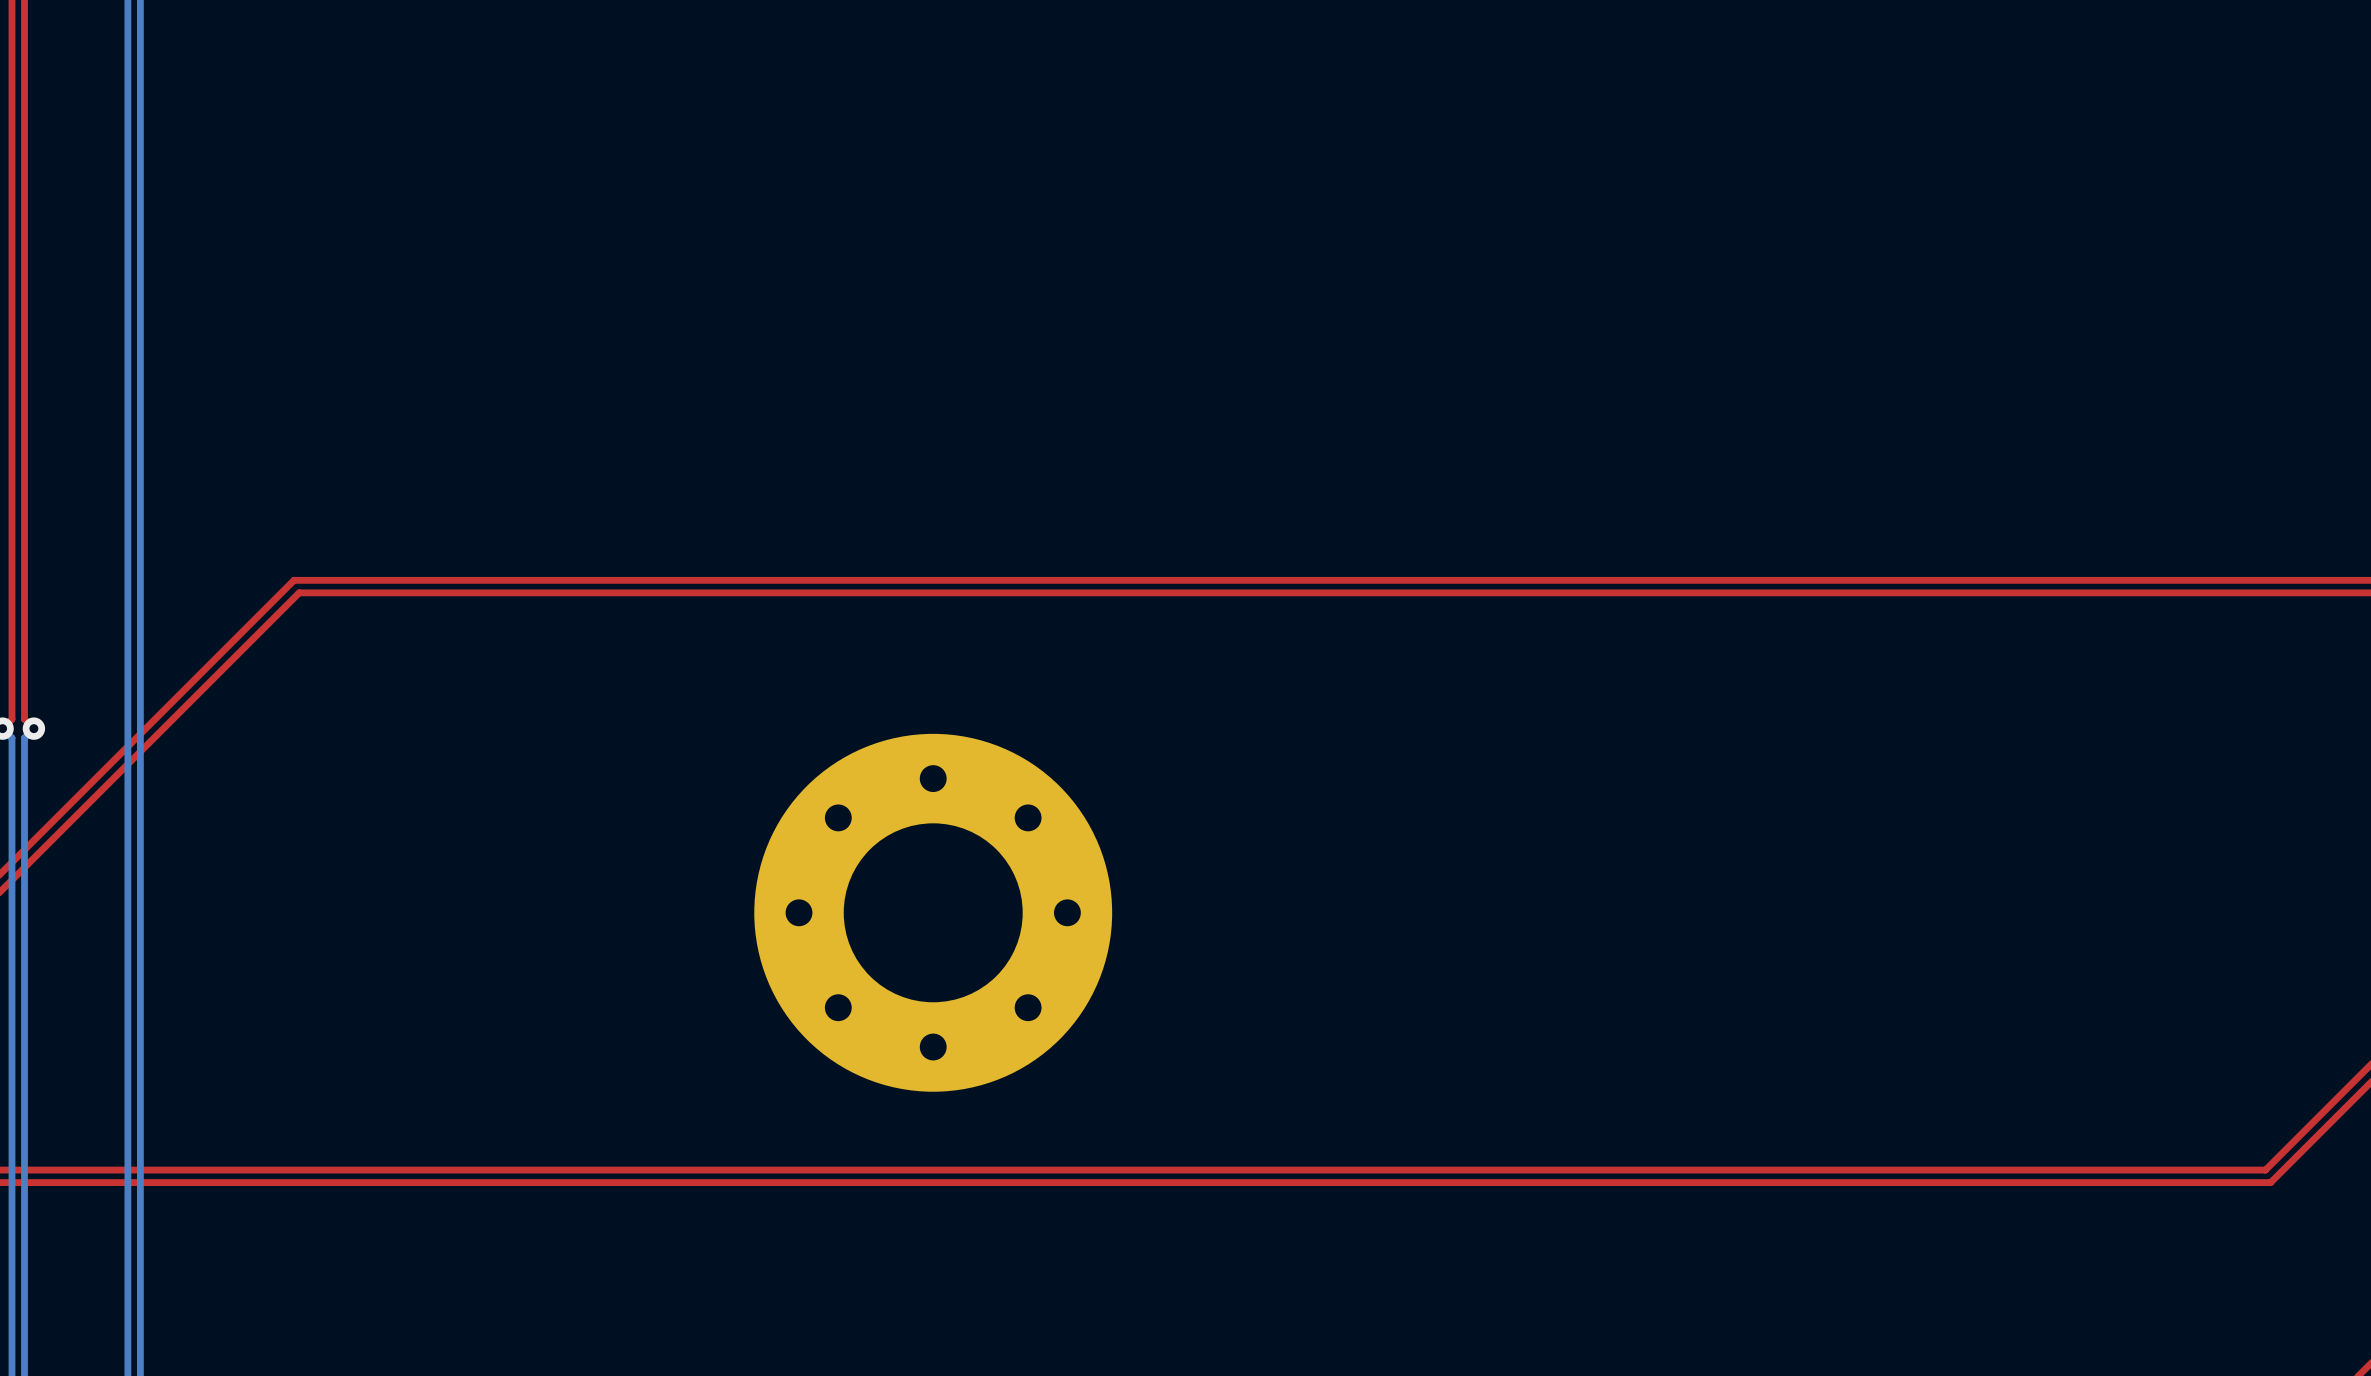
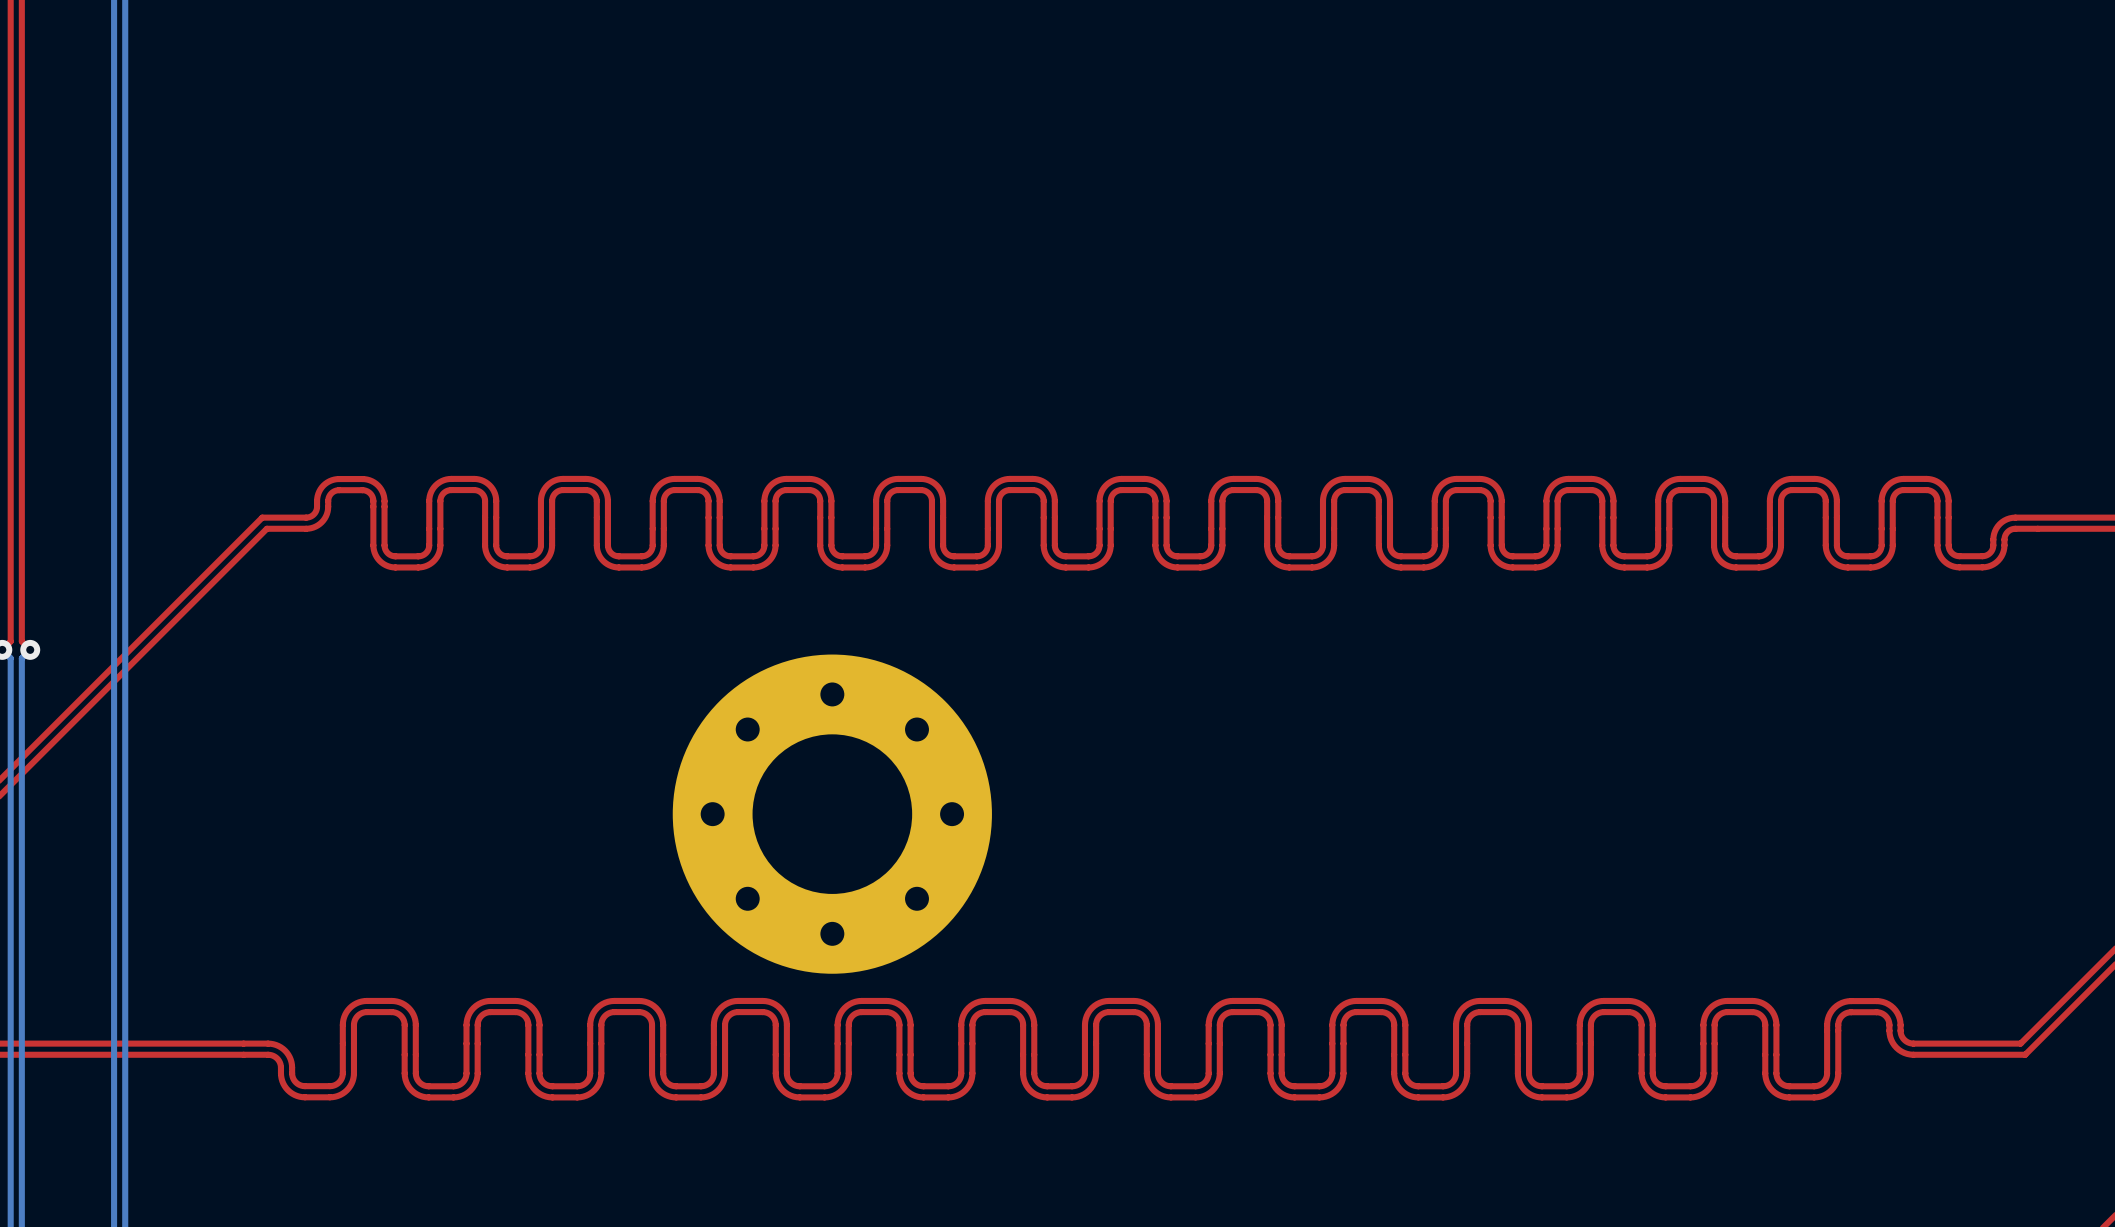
top track: (2259, 580) (343, 580) -> (2015, 517) (2006, 519) (1997, 526) (1994, 533) (1992, 549) (1987, 554) (1956, 555) (1951, 553) (1948, 546) (1948, 498) (1943, 487) (1931, 479) (1898, 479) (1888, 485) (1882, 496) (1879, 551) (1871, 556) (1845, 556) (1840, 553) (1837, 547) (1836, 498) (1832, 487) (1819, 479) (1789, 479) (1778, 483) (1771, 493) (1768, 551) (1760, 556) (1734, 556) (1729, 553) (1725, 547) (1725, 498) (1720, 487) (1707, 479) (1677, 479) (1666, 483) (1659, 493) (1656, 551) (1648, 556) (1623, 556) (1617, 553) (1613, 547) (1612, 493) (1603, 482) (1591, 478) (1563, 479) (1551, 487) (1546, 498) (1546, 548) (1542, 554) (1535, 556) (1511, 556) (1504, 552) (1501, 545) (1500, 493) (1493, 483) (1479, 478) (1451, 479) (1439, 487) (1434, 498) (1434, 548) (1430, 554) (1423, 556) (1399, 556) (1392, 552) (1390, 545) (1388, 493) (1379, 482) (1367, 478) (1340, 479) (1327, 487) (1323, 498) (1322, 548) (1318, 554) (1312, 556) (1287, 556) (1280, 552) (1278, 545) (1277, 493) (1267, 482) (1256, 478) (1228, 479) (1216, 487) (1211, 498) (1210, 548) (1206, 554) (1200, 556) (1176, 556) (1168, 552) (1166, 545) (1165, 493) (1156, 482) (1144, 478) (1116, 479) (1104, 487) (1099, 498) (1099, 548) (1095, 554) (1088, 556) (1064, 556) (1057, 552) (1054, 545) (1053, 493) (1044, 482) (1032, 478) (1005, 479) (992, 487) (987, 498) (987, 548) (983, 554) (976, 556) (952, 556) (945, 552) (943, 545) (941, 493) (934, 483) (923, 479) (893, 479) (880, 487) (876, 498) (875, 548) (871, 554) (865, 556) (840, 556) (833, 552) (831, 545) (830, 493) (823, 483) (811, 479) (781, 479) (769, 487) (764, 498) (764, 548) (760, 554) (754, 556) (729, 556) (721, 552) (719, 545) (718, 493) (711, 483) (700, 479) (669, 479) (657, 487) (652, 498) (652, 548) (649, 553) (643, 556) (617, 556) (610, 552) (607, 545) (606, 493) (599, 483) (588, 479) (558, 479) (545, 487) (541, 498) (540, 548) (536, 554) (531, 556) (505, 556) (498, 552) (496, 545) (495, 496) (489, 485) (479, 479) (446, 479) (434, 487) (429, 498) (429, 546) (426, 552) (421, 555) (394, 556) (386, 552) (384, 545) (383, 496) (378, 485) (369, 480) (339, 479) (327, 482) (318, 493) (315, 512) (306, 517)
top track: (2259, 592) (343, 592) -> (2015, 528) (2005, 534) (2002, 553) (1993, 564) (1982, 567) (1953, 566) (1943, 560) (1938, 550) (1935, 495) (1927, 490) (1901, 490) (1895, 493) (1893, 498) (1892, 547) (1887, 559) (1875, 566) (1842, 566) (1832, 561) (1826, 550) (1824, 495) (1815, 490) (1790, 490) (1784, 493) (1781, 498) (1780, 547) (1776, 559) (1763, 566) (1733, 567) (1722, 562) (1715, 552) (1712, 495) (1704, 490) (1679, 490) (1673, 492) (1669, 498) (1669, 547) (1664, 559) (1652, 566) (1621, 567) (1610, 562) (1603, 552) (1602, 499) (1598, 492) (1591, 490) (1567, 490) (1559, 494) (1557, 501) (1556, 552) (1549, 562) (1535, 567) (1507, 566) (1495, 559) (1490, 547) (1490, 498) (1486, 492) (1479, 490) (1455, 490) (1448, 494) (1445, 501) (1444, 552) (1437, 562) (1423, 567) (1396, 566) (1383, 559) (1379, 547) (1378, 498) (1374, 492) (1367, 490) (1343, 490) (1336, 494) (1334, 501) (1332, 552) (1323, 564) (1312, 567) (1284, 566) (1271, 559) (1267, 547) (1266, 498) (1262, 492) (1256, 490) (1231, 490) (1224, 494) (1222, 501) (1221, 552) (1214, 562) (1200, 567) (1172, 566) (1160, 559) (1155, 547) (1155, 498) (1151, 492) (1144, 490) (1120, 490) (1112, 494) (1110, 501) (1109, 552) (1102, 562) (1088, 567) (1060, 566) (1048, 559) (1043, 547) (1043, 498) (1039, 492) (1032, 490) (1008, 490) (1001, 494) (998, 501) (997, 552) (990, 562) (976, 567) (949, 566) (936, 559) (932, 547) (931, 498) (927, 492) (920, 490) (896, 490) (889, 494) (887, 501) (886, 552) (878, 562) (867, 567) (837, 566) (825, 559) (820, 547) (819, 498) (815, 492) (810, 490) (785, 490) (777, 494) (775, 501) (774, 552) (767, 562) (755, 567) (725, 566) (713, 559) (708, 547) (708, 498) (704, 492) (698, 490) (673, 490) (666, 494) (663, 501) (662, 552) (655, 562) (644, 567) (614, 566) (601, 559) (596, 547) (596, 498) (592, 492) (587, 490) (561, 490) (554, 494) (552, 501) (550, 552) (543, 562) (532, 567) (502, 566) (489, 559) (485, 547) (484, 498) (480, 492) (475, 490) (449, 490) (442, 494) (440, 501) (439, 550) (433, 561) (423, 566) (390, 566) (378, 559) (373, 547) (373, 498) (366, 490) (333, 491) (328, 497) (327, 511) (323, 520) (315, 526) (306, 528)
top track: (2145, 1170) (300, 1170) -> (1913, 1043) (1906, 1041) (1902, 1037) (1898, 1015) (1888, 1004) (1876, 1001) (1844, 1001) (1834, 1008) (1827, 1018) (1827, 1073) (1825, 1080) (1815, 1086) (1786, 1085) (1780, 1082) (1776, 1076) (1776, 1022) (1771, 1010) (1757, 1001) (1722, 1001) (1710, 1008) (1704, 1019) (1703, 1073) (1701, 1080) (1691, 1086) (1664, 1086) (1657, 1083) (1653, 1076) (1652, 1025) (1650, 1015) (1643, 1005) (1628, 1000) (1597, 1001) (1584, 1010) (1579, 1021) (1579, 1076) (1574, 1083) (1566, 1086) (1540, 1086) (1531, 1081) (1529, 1074) (1528, 1018) (1519, 1005) (1504, 1000) (1473, 1001) (1461, 1010) (1456, 1021) (1455, 1076) (1451, 1083) (1443, 1086) (1416, 1086) (1408, 1081) (1405, 1074) (1404, 1018) (1395, 1005) (1381, 1000) (1350, 1001) (1337, 1010) (1332, 1021) (1332, 1076) (1327, 1083) (1319, 1086) (1293, 1086) (1284, 1081) (1281, 1074) (1280, 1018) (1272, 1005) (1257, 1000) (1226, 1001) (1213, 1010) (1208, 1021) (1208, 1076) (1203, 1083) (1195, 1086) (1169, 1086) (1160, 1081) (1158, 1074) (1157, 1018) (1148, 1005) (1133, 1000) (1102, 1001) (1089, 1010) (1085, 1021) (1084, 1076) (1080, 1083) (1071, 1086) (1045, 1086) (1037, 1081) (1034, 1074) (1033, 1018) (1024, 1005) (1010, 1000) (979, 1001) (966, 1010) (961, 1021) (960, 1076) (956, 1083) (949, 1086) (922, 1086) (913, 1081) (910, 1074) (909, 1018) (901, 1005) (886, 1000) (855, 1001) (842, 1010) (837, 1021) (837, 1076) (832, 1083) (826, 1086) (798, 1086) (788, 1080) (786, 1073) (786, 1018) (779, 1008) (765, 1001) (734, 1001) (725, 1004) (718, 1010) (714, 1021) (713, 1076) (709, 1083) (702, 1086) (674, 1086) (665, 1080) (663, 1073) (662, 1018) (653, 1005) (642, 1001) (611, 1001) (602, 1004) (595, 1010) (590, 1021) (589, 1076) (585, 1083) (578, 1086) (551, 1086) (541, 1080) (539, 1073) (538, 1018) (532, 1008) (518, 1001) (487, 1001) (478, 1004) (471, 1010) (466, 1021) (466, 1076) (462, 1082) (454, 1086) (427, 1086) (417, 1080) (415, 1073) (415, 1019) (408, 1008) (397, 1001) (361, 1001) (348, 1010) (342, 1022) (342, 1074) (340, 1081) (333, 1085) (298, 1084) (293, 1078) (291, 1062) (286, 1052) (278, 1046) (268, 1043)
top track: (2145, 1182) (300, 1182) -> (1913, 1054) (1901, 1051) (1894, 1045) (1890, 1036) (1888, 1020) (1883, 1014) (1876, 1012) (1846, 1012) (1841, 1017) (1838, 1022) (1838, 1076) (1833, 1088) (1819, 1096) (1784, 1096) (1772, 1090) (1765, 1078) (1765, 1025) (1763, 1018) (1753, 1012) (1726, 1012) (1718, 1015) (1714, 1022) (1714, 1076) (1709, 1088) (1695, 1096) (1663, 1097) (1650, 1092) (1642, 1081) (1641, 1022) (1636, 1014) (1628, 1012) (1602, 1012) (1593, 1016) (1590, 1023) (1589, 1081) (1581, 1092) (1566, 1097) (1536, 1096) (1523, 1088) (1518, 1076) (1517, 1022) (1513, 1014) (1504, 1012) (1478, 1012) (1470, 1016) (1467, 1023) (1465, 1081) (1458, 1092) (1443, 1097) (1412, 1096) (1399, 1088) (1394, 1076) (1393, 1022) (1389, 1014) (1381, 1012) (1355, 1012) (1346, 1016) (1343, 1023) (1342, 1079) (1334, 1092) (1319, 1097) (1288, 1096) (1275, 1088) (1270, 1076) (1270, 1022) (1265, 1014) (1257, 1012) (1231, 1012) (1222, 1016) (1219, 1023) (1218, 1081) (1208, 1093) (1195, 1097) (1165, 1096) (1152, 1088) (1146, 1076) (1146, 1022) (1141, 1014) (1133, 1012) (1107, 1012) (1098, 1016) (1096, 1023) (1095, 1079) (1086, 1092) (1071, 1097) (1041, 1096) (1028, 1088) (1023, 1076) (1022, 1022) (1018, 1014) (1010, 1012) (982, 1012) (974, 1018) (972, 1025) (971, 1081) (963, 1092) (951, 1097) (918, 1096) (904, 1088) (899, 1076) (899, 1022) (895, 1015) (887, 1012) (860, 1012) (850, 1018) (848, 1025) (847, 1079) (841, 1090) (827, 1097) (796, 1097) (787, 1094) (780, 1088) (775, 1076) (775, 1022) (770, 1014) (764, 1012) (736, 1012) (727, 1016) (725, 1023) (723, 1081) (715, 1092) (703, 1097) (670, 1096) (657, 1088) (652, 1076) (651, 1022) (647, 1014) (640, 1012) (612, 1012) (603, 1018) (601, 1025) (600, 1079) (591, 1092) (580, 1097) (549, 1097) (540, 1094) (533, 1088) (528, 1076) (528, 1022) (523, 1014) (516, 1012) (489, 1012) (479, 1018) (477, 1025) (476, 1079) (470, 1090) (456, 1097) (425, 1097) (416, 1094) (409, 1088) (404, 1076) (404, 1022) (400, 1015) (394, 1012) (365, 1012) (355, 1018) (353, 1025) (353, 1078) (348, 1088) (337, 1095) (305, 1097) (292, 1093) (282, 1081) (279, 1061) (274, 1056) (268, 1054)

